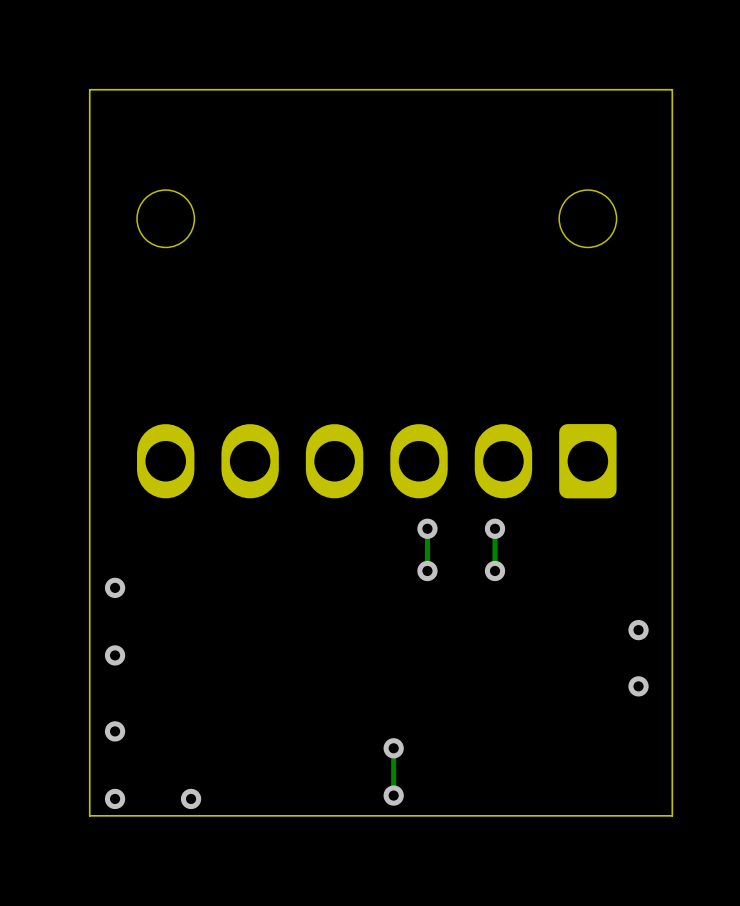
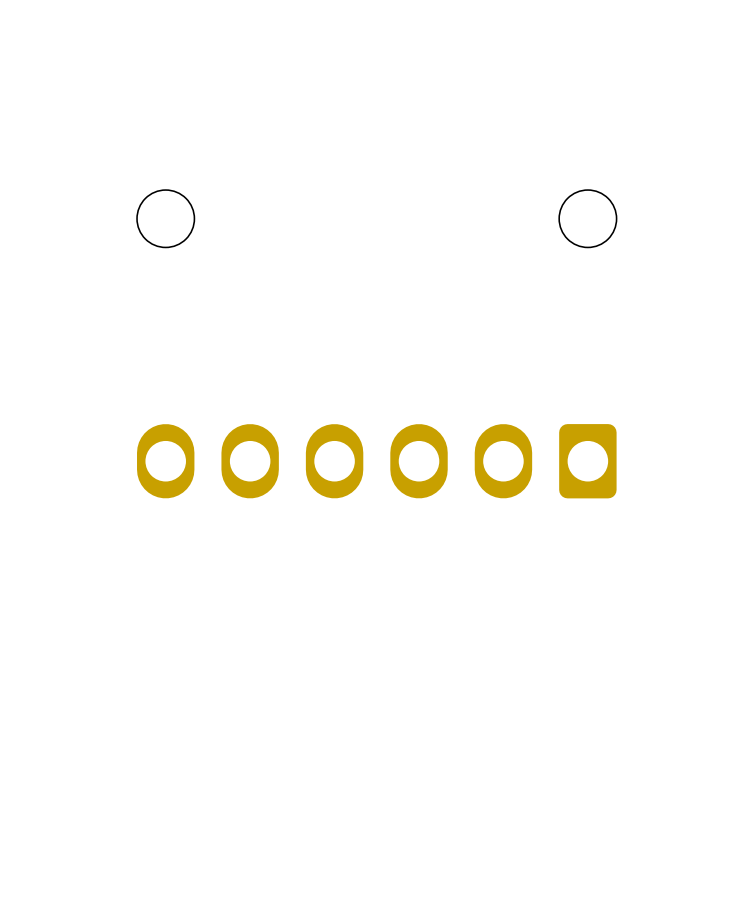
board edge: (672, 89) (89, 89) (89, 815) (672, 815) (672, 89) -> none
track: (427, 528) (427, 570) -> none
via: (427, 528) -> none
track: (495, 528) (495, 570) -> none
via: (495, 528) -> none
via: (427, 570) -> none
via: (495, 570) -> none
via: (115, 587) -> none
via: (638, 630) -> none
via: (115, 655) -> none
via: (638, 686) -> none
via: (115, 731) -> none
track: (393, 748) (393, 795) -> none
via: (393, 748) -> none
via: (393, 795) -> none
via: (115, 798) -> none
via: (191, 798) -> none

